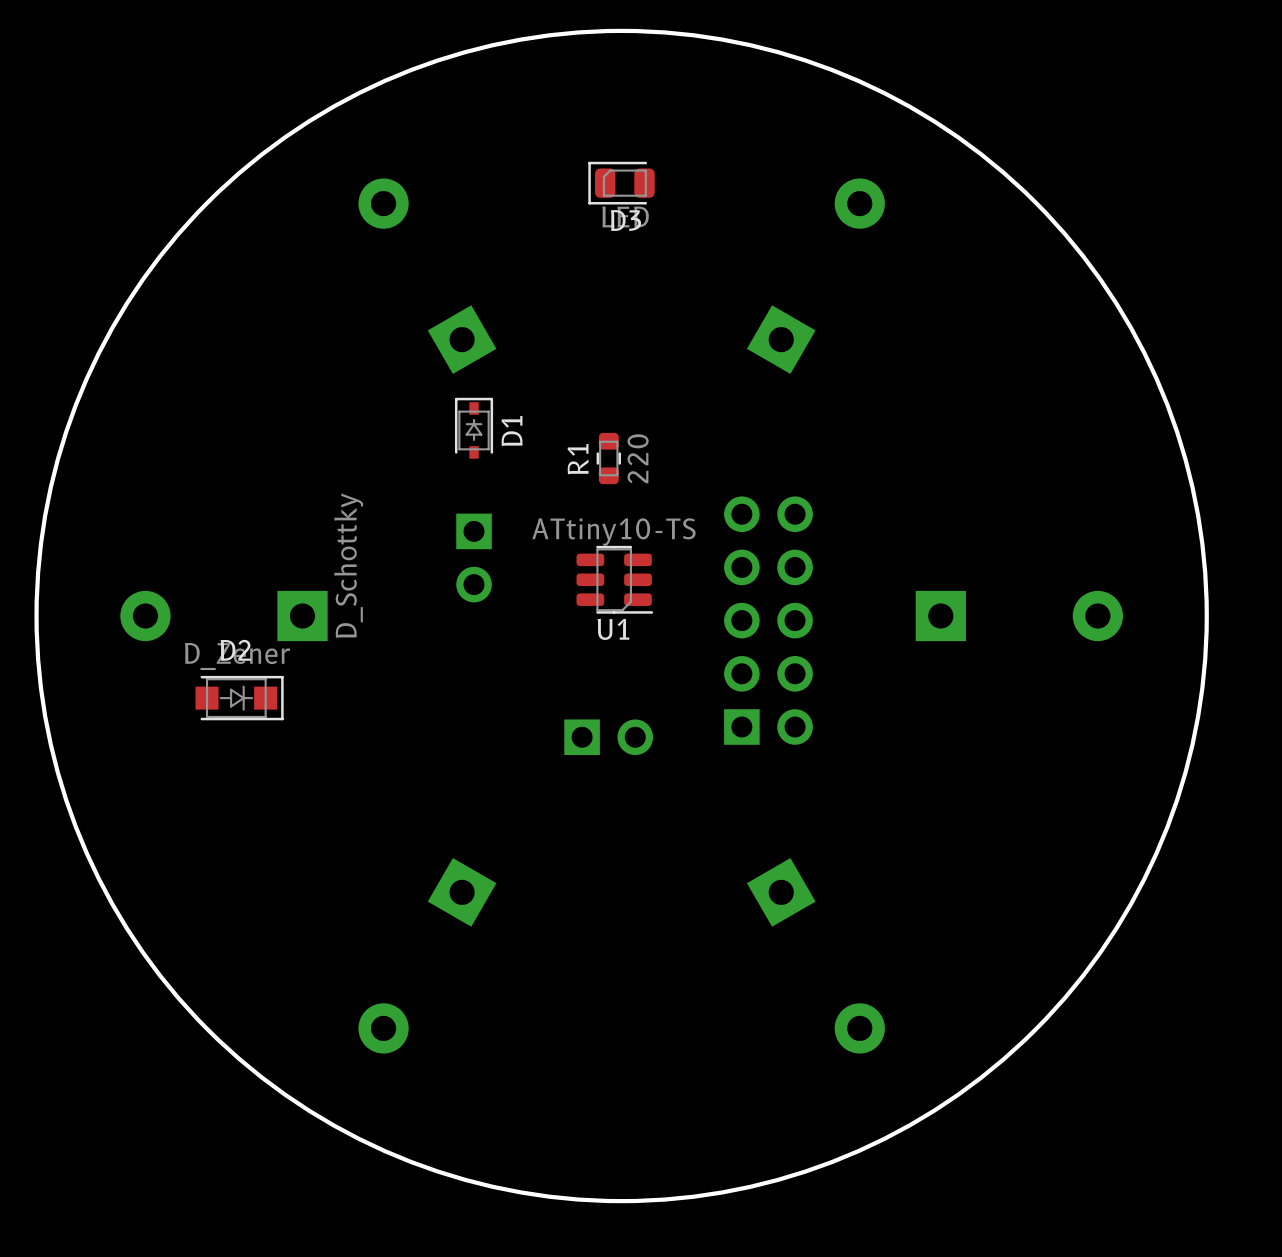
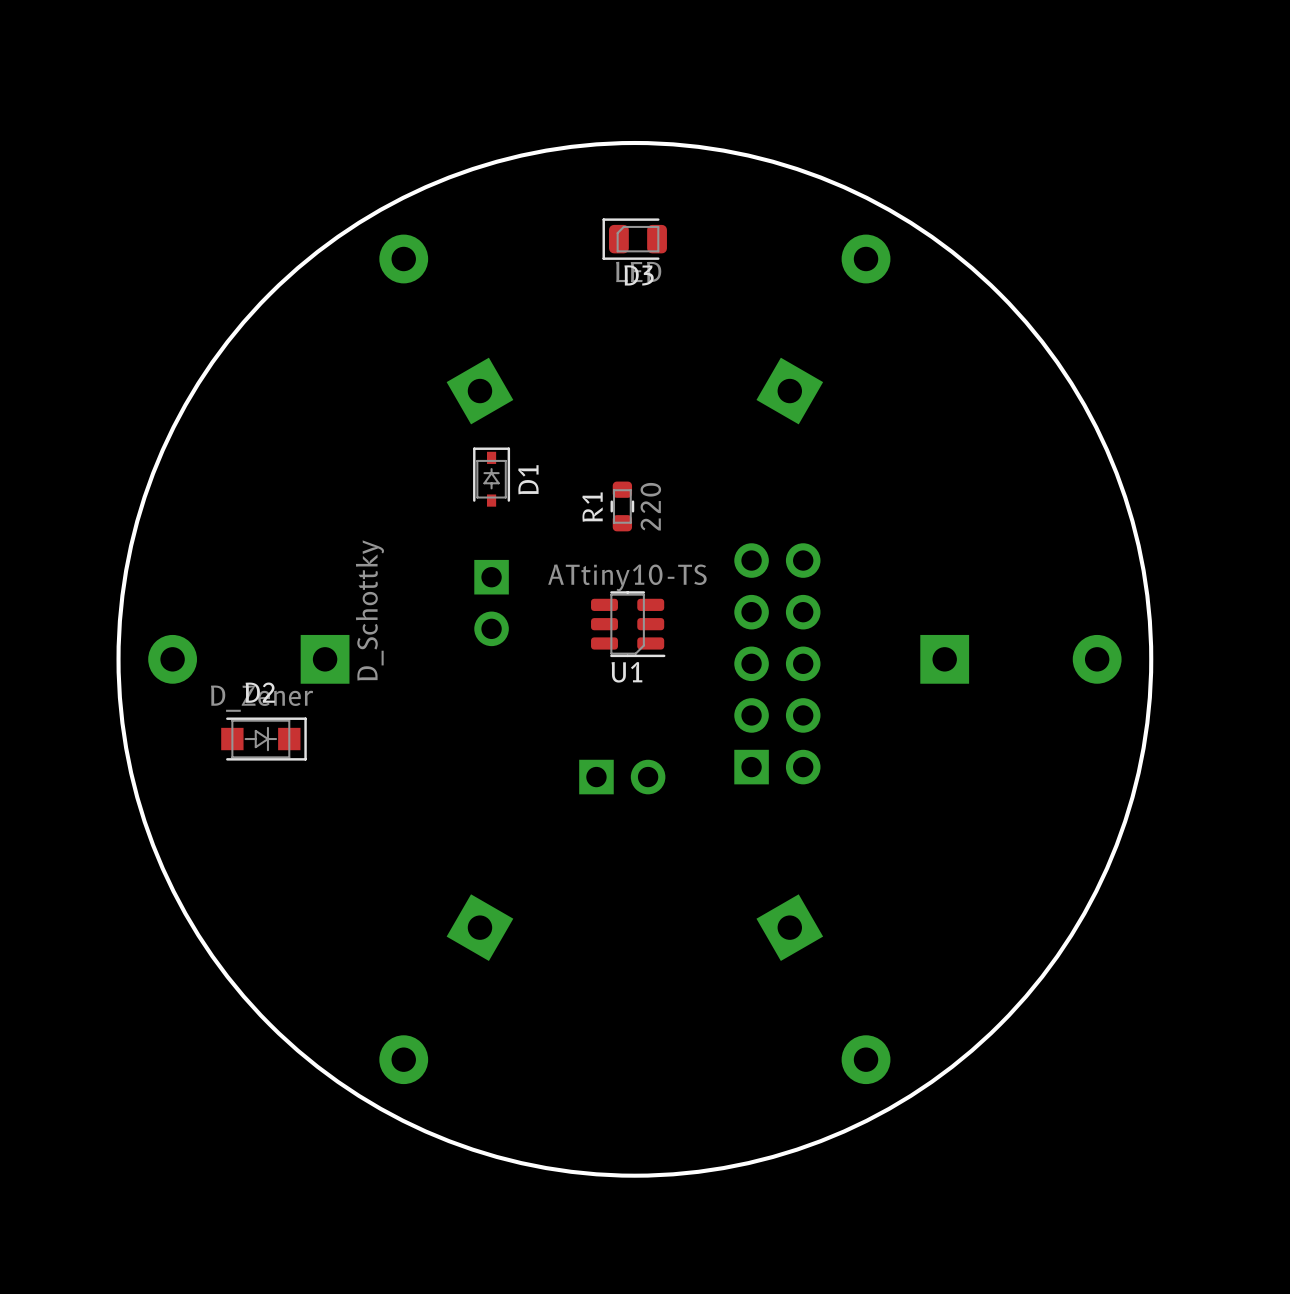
round board edge size: [34, 28, 1209, 1204] -> [116, 140, 1154, 1178]

